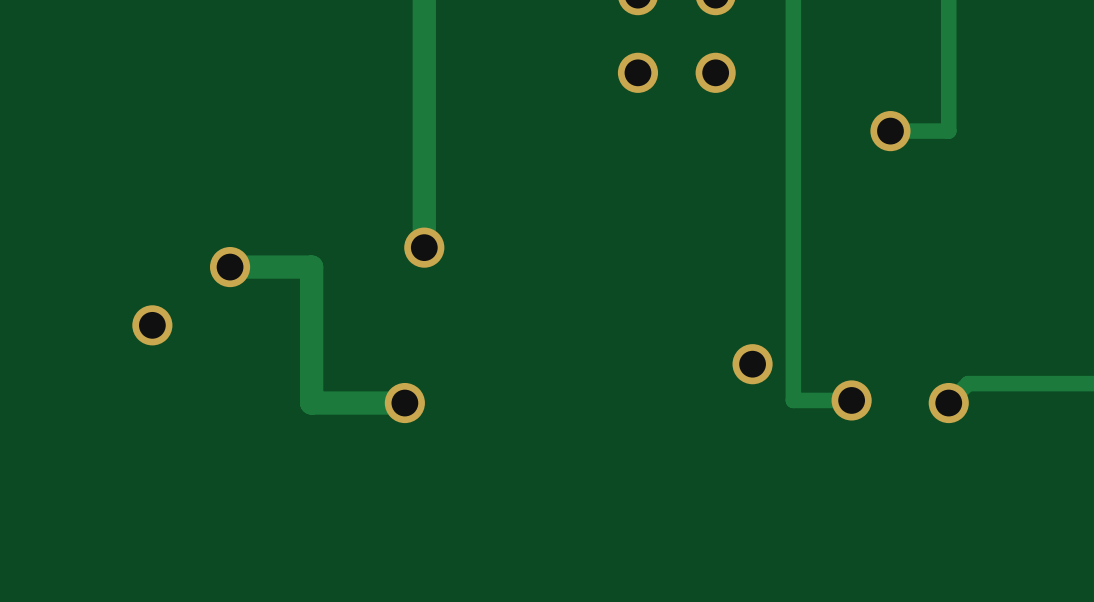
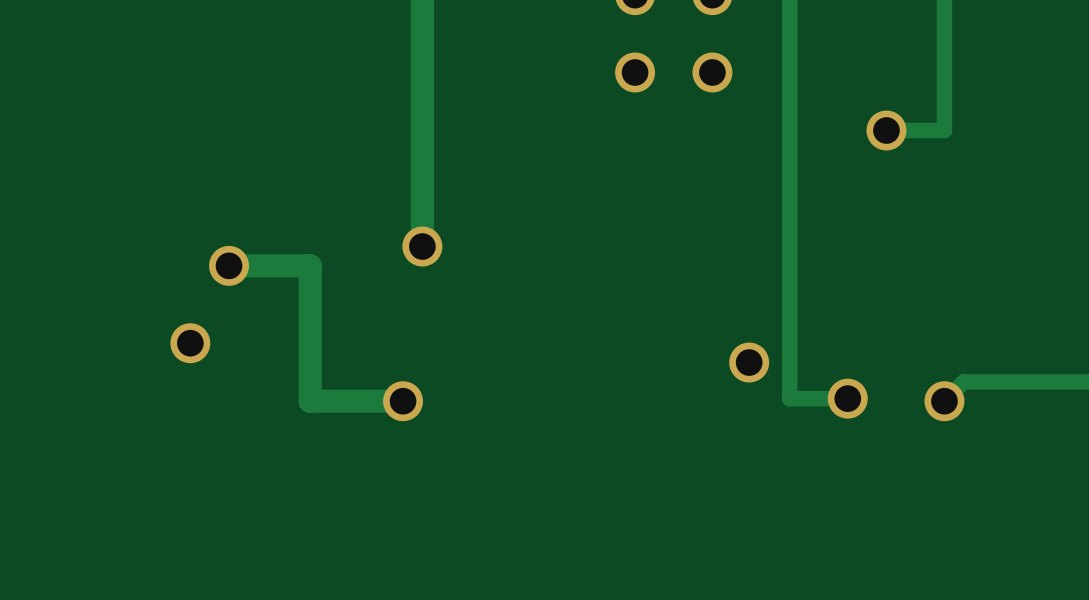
via position: (152, 325) -> (190, 343)

